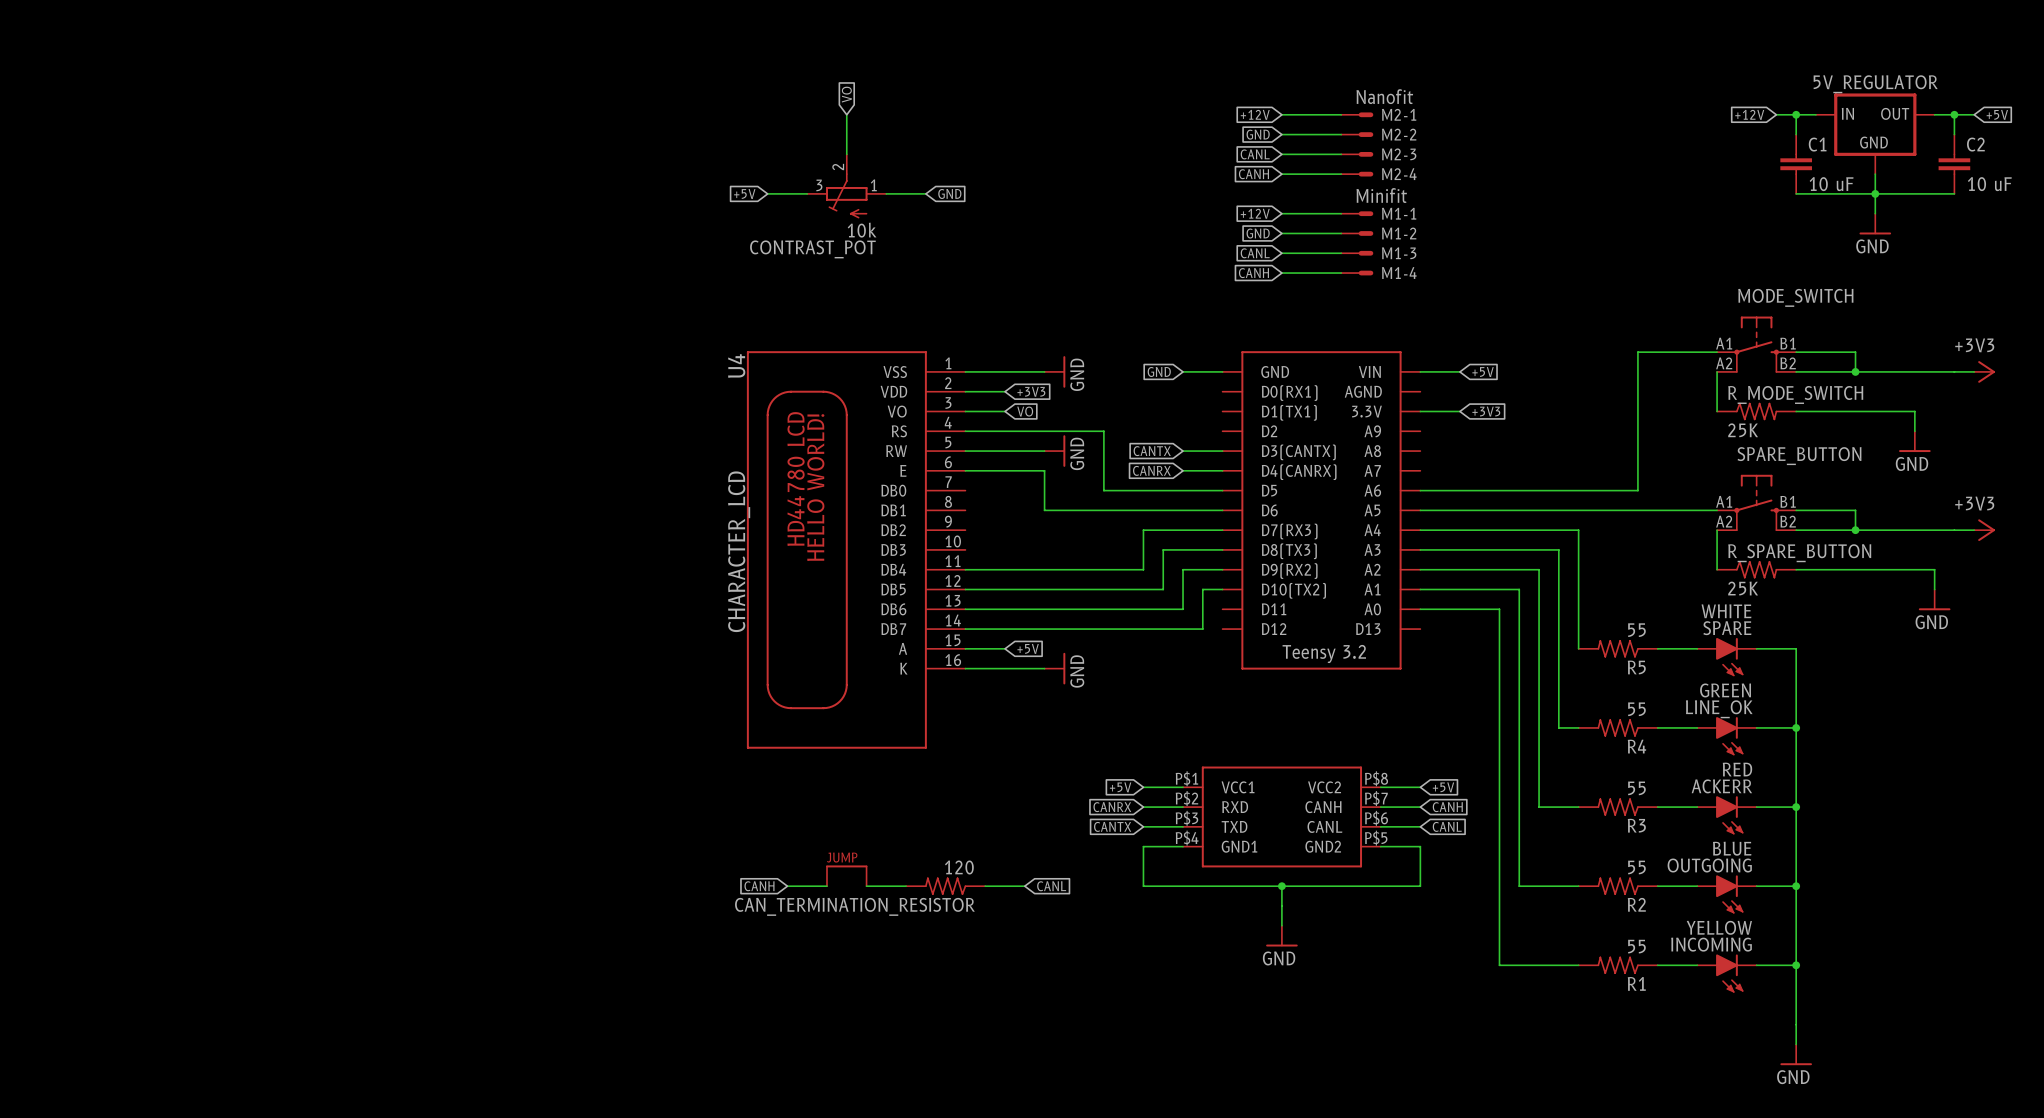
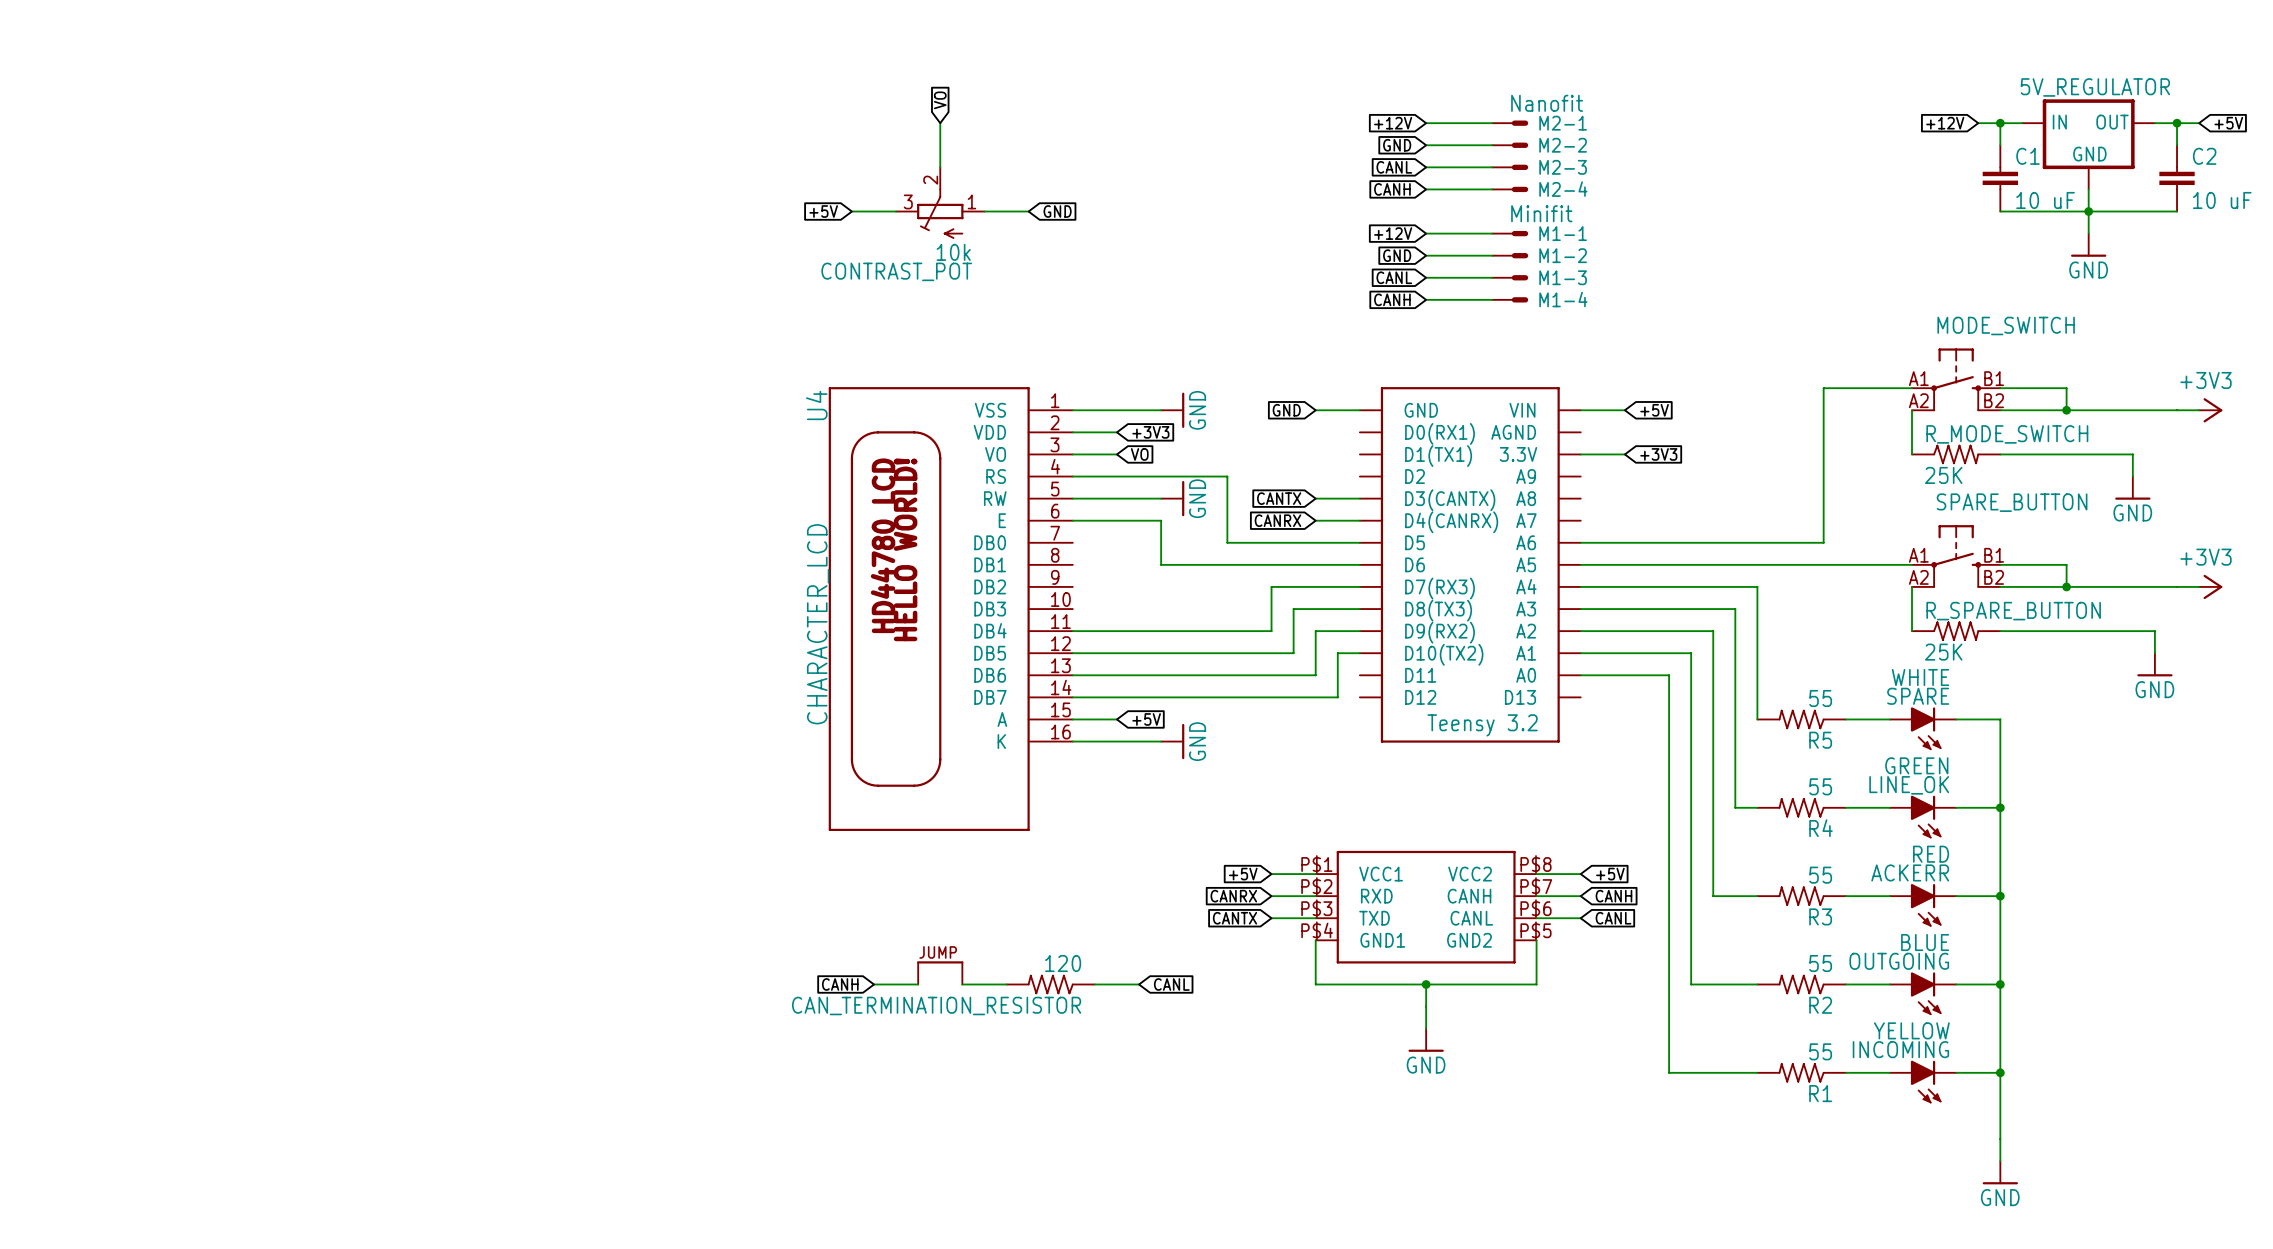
wire: (1183, 846) (1143, 846) (1143, 886) (1183, 886) -> (1315, 940) (1315, 984)
wire: (1380, 846) (1420, 846) (1420, 886) (1380, 886) -> (1536, 940) (1536, 984)

